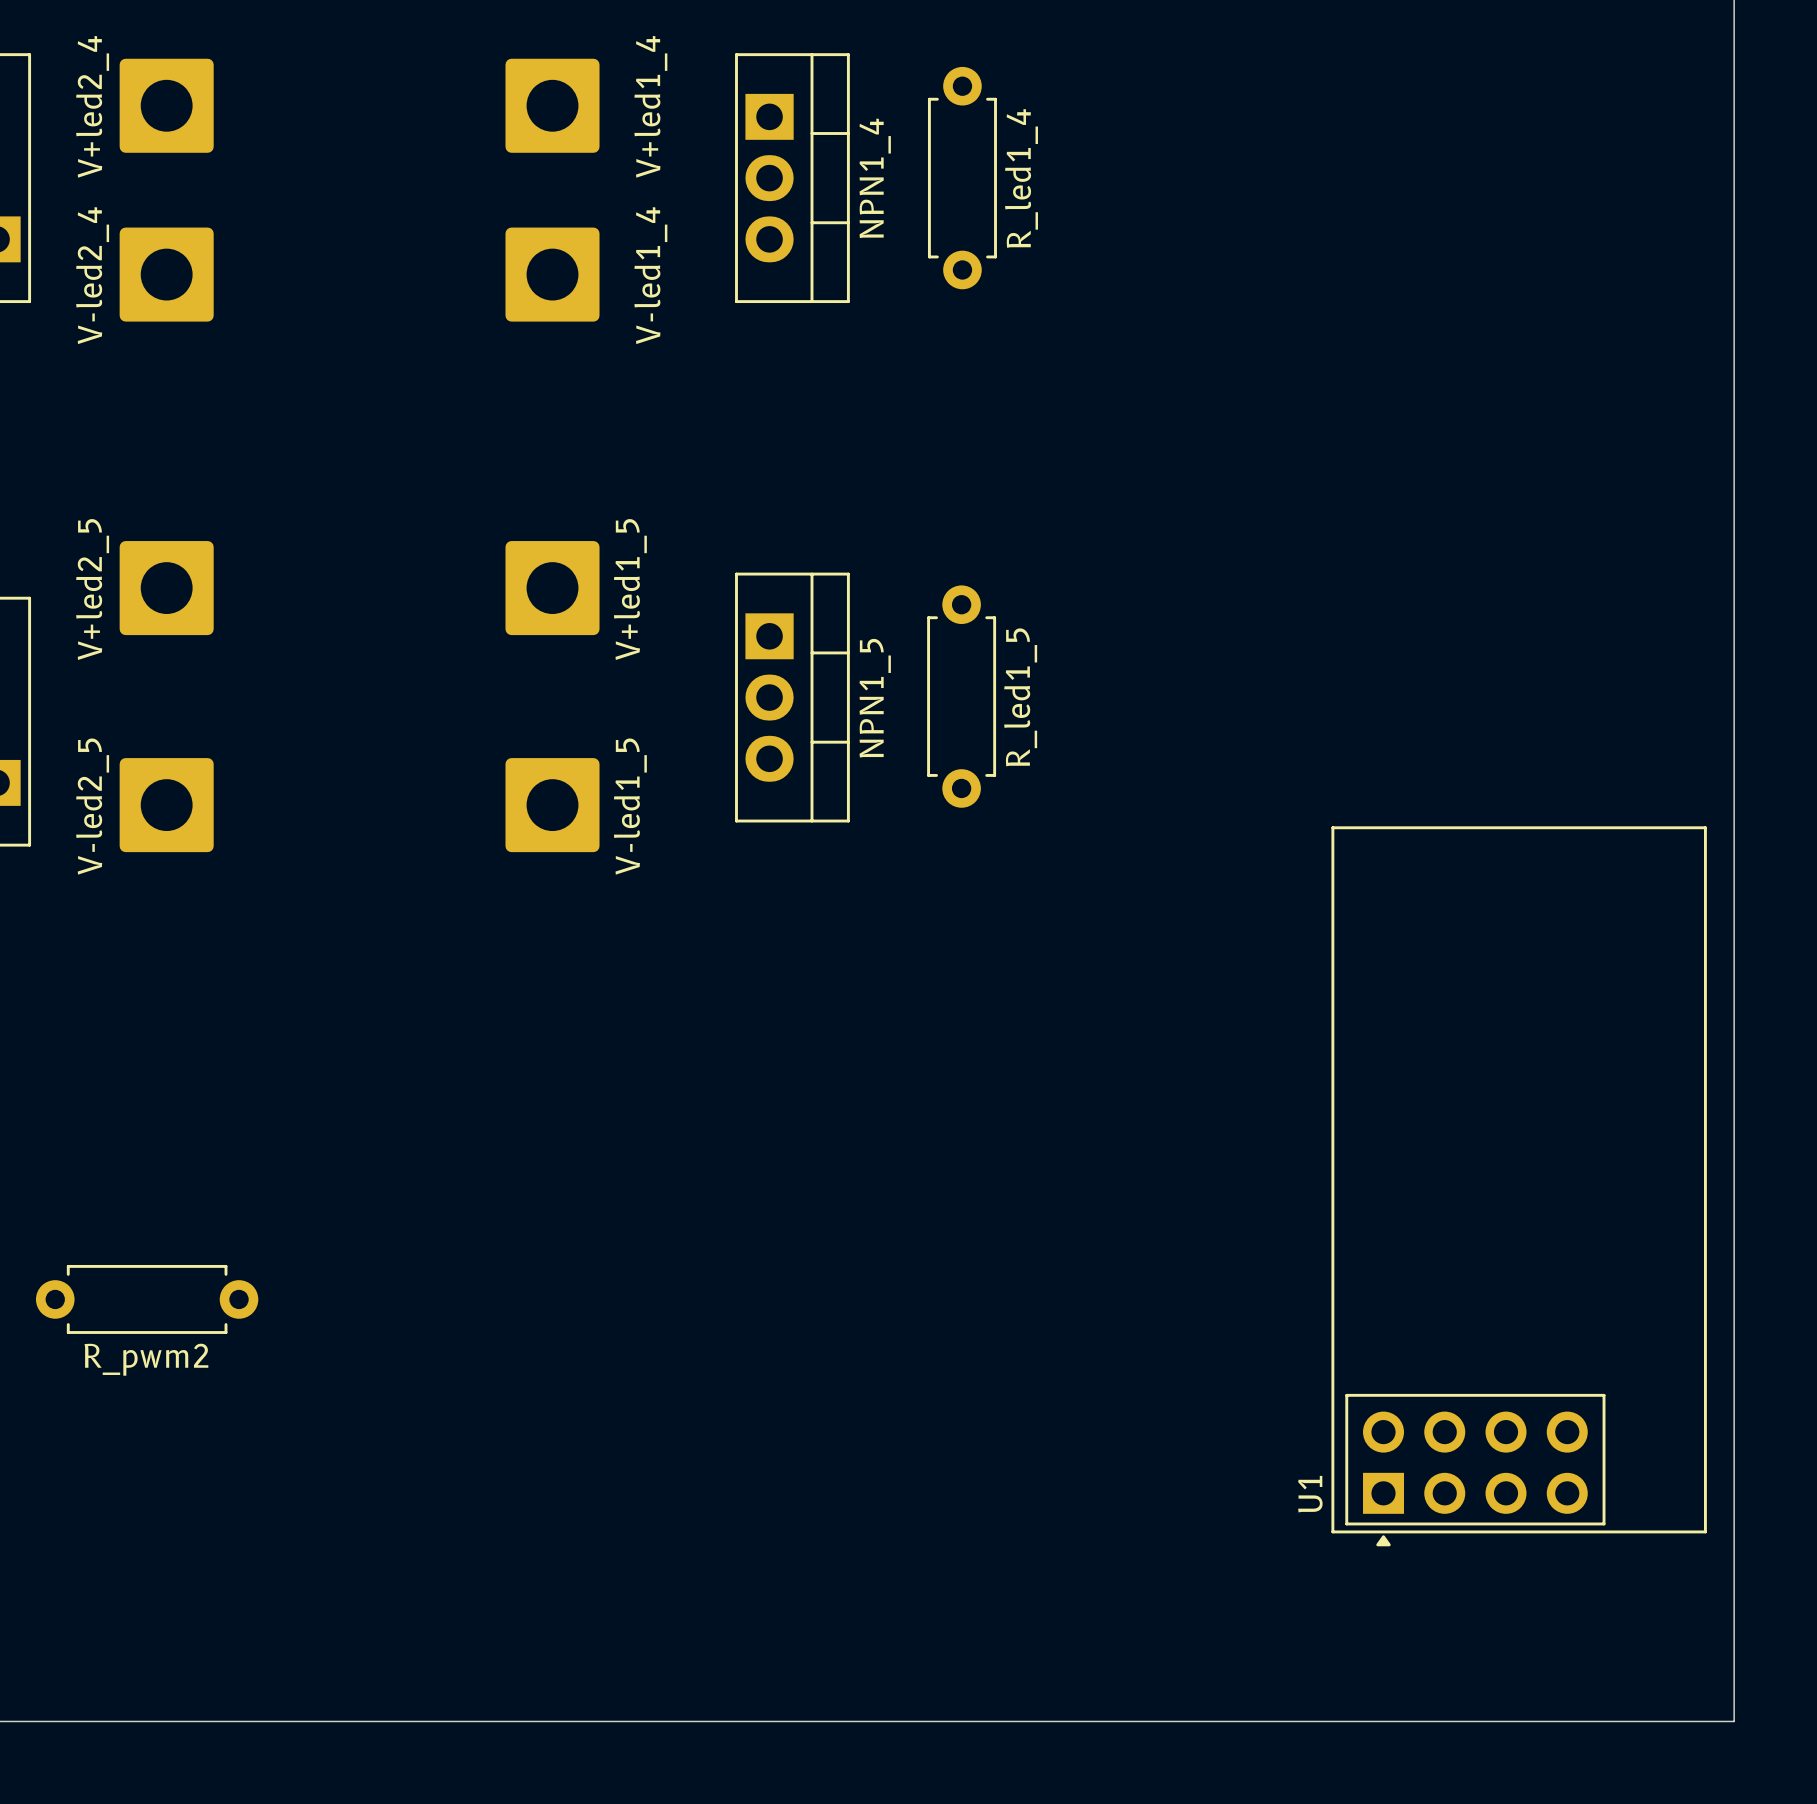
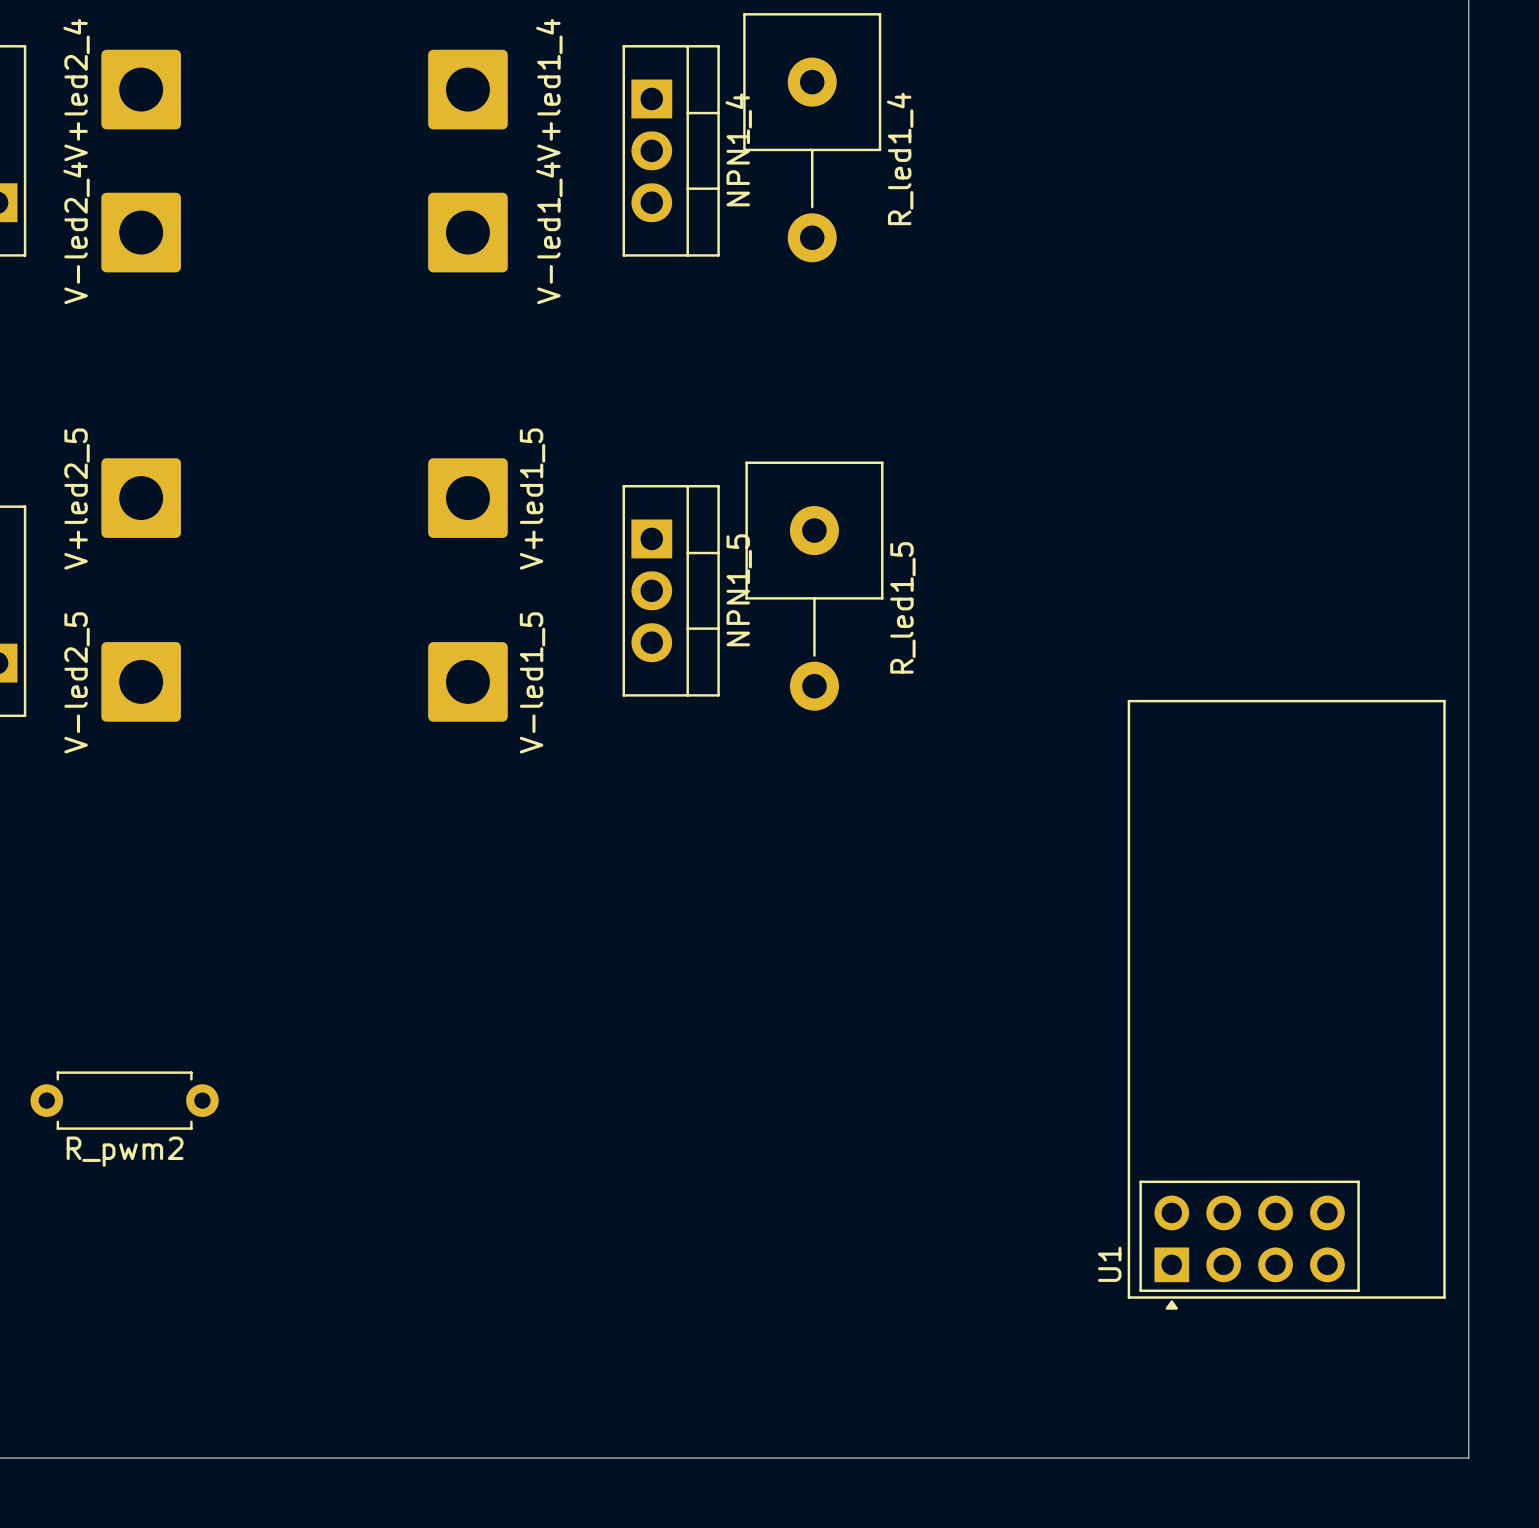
R_led1_4 footprint: [927, 66, 997, 290] -> [743, 13, 882, 263]
R_led1_4 name position: R_led1_4 (1021, 178) -> R_led1_4 (900, 158)
R_led1_5 footprint: [927, 585, 997, 808] -> [745, 461, 884, 711]
R_led1_5 name position: R_led1_5 (1020, 697) -> R_led1_5 (902, 607)

